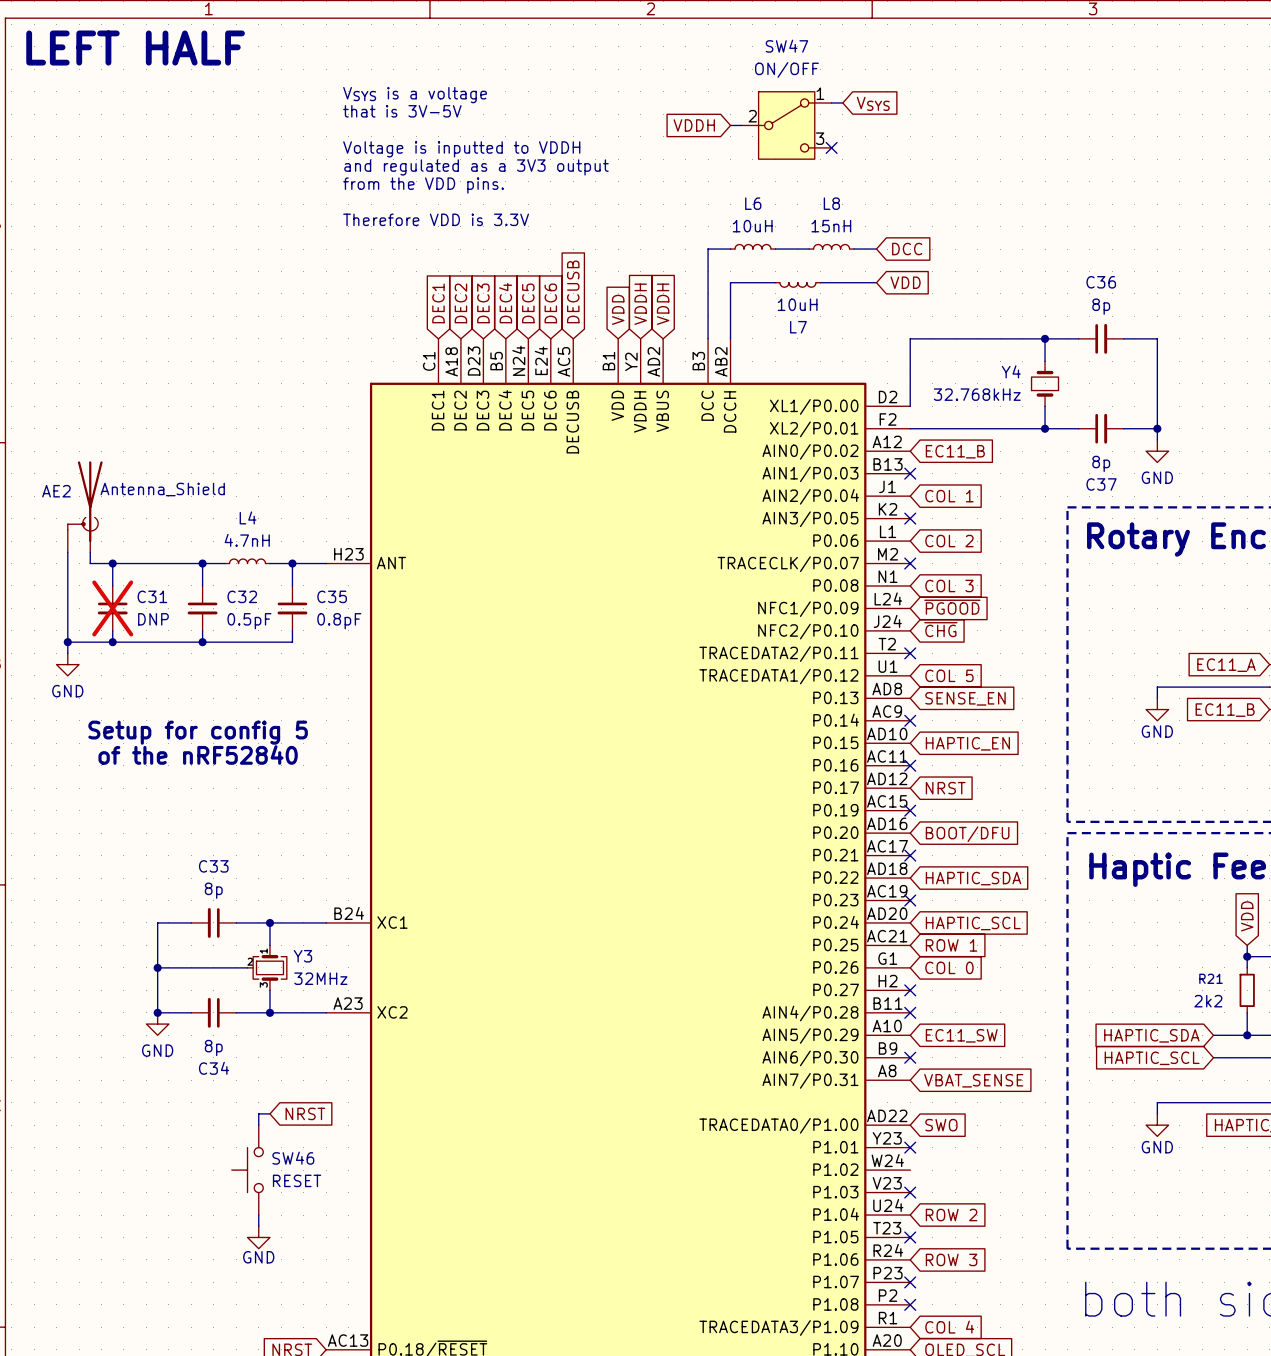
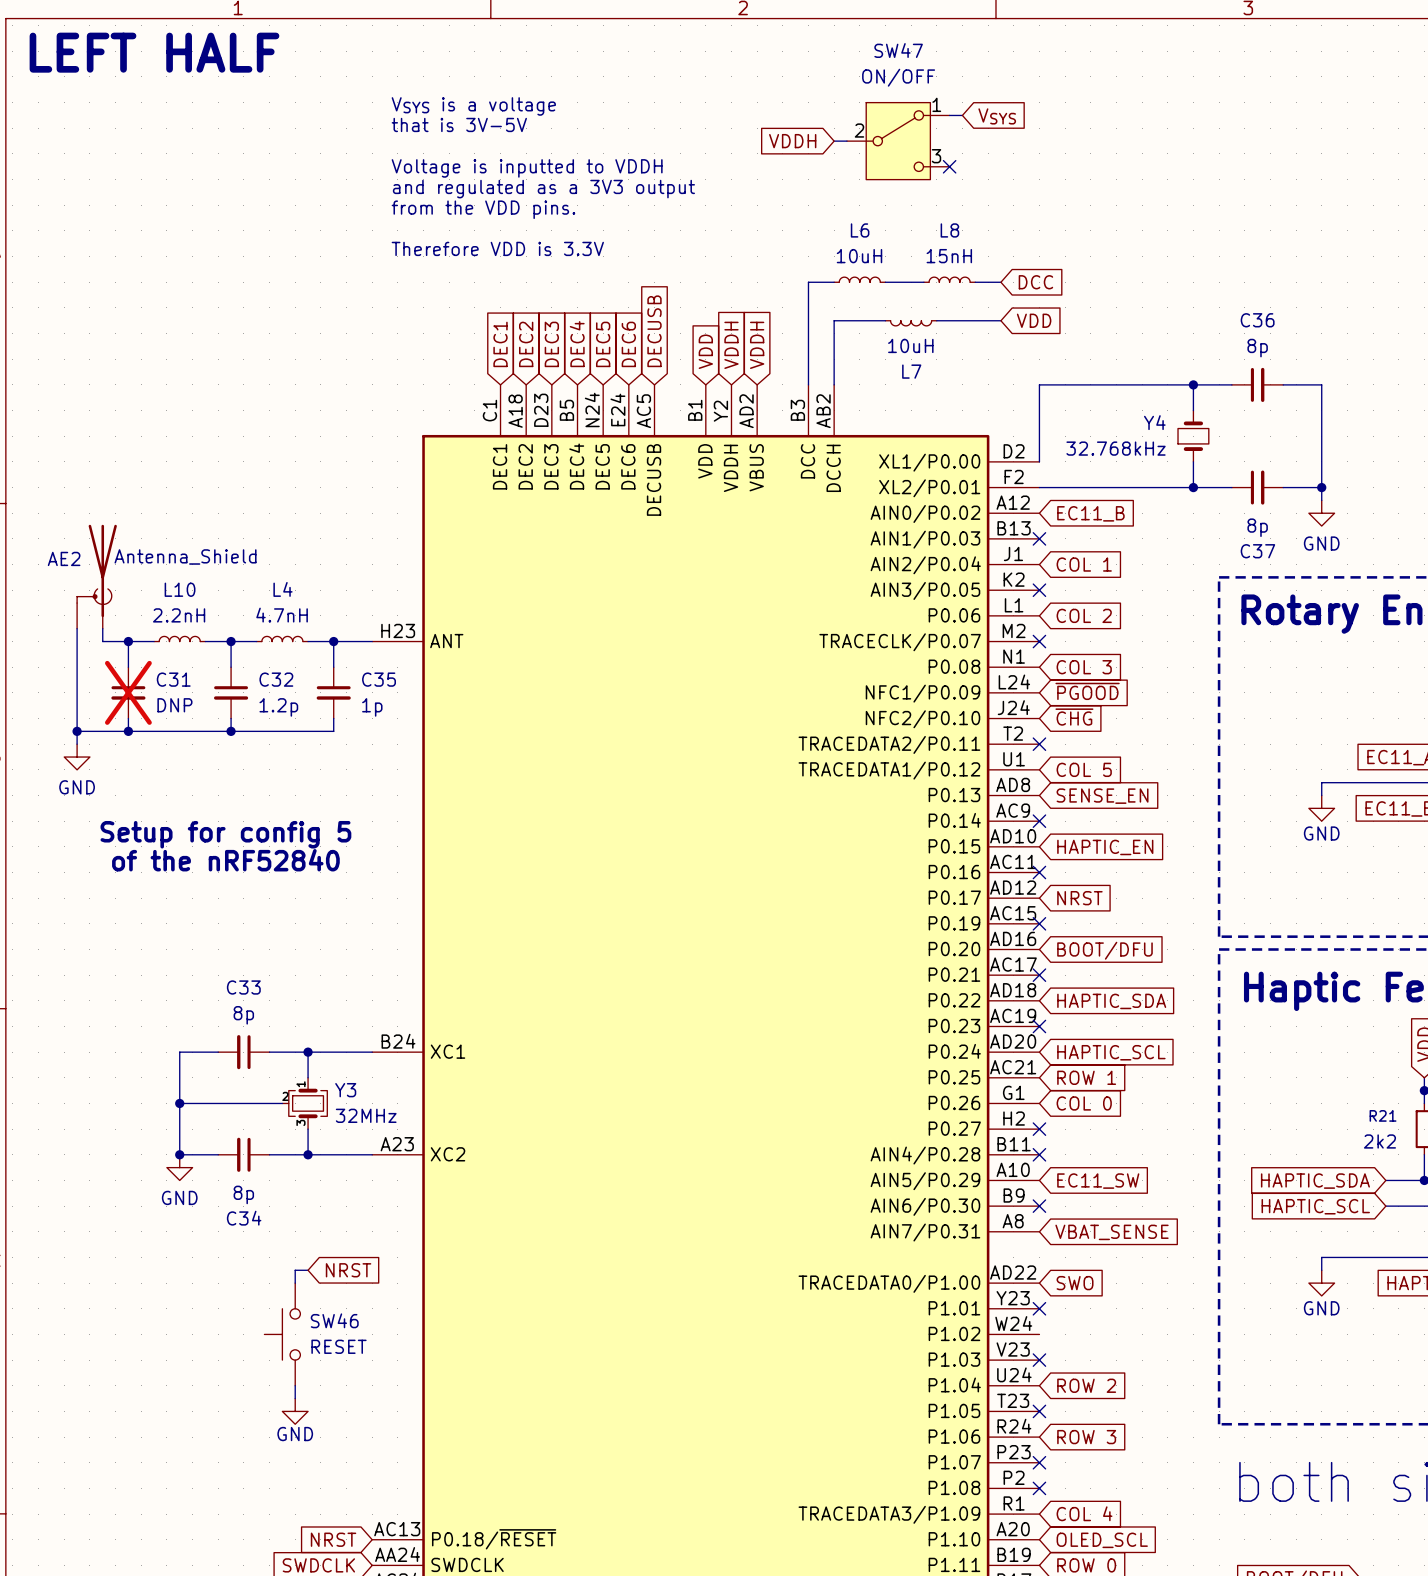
L10: none -> 2.2nH (179, 638)
wire: (135, 563) (180, 563) -> none
C32 value: 0.5pF (249, 621) -> 1.2p (278, 707)
C35 value: 0.8pF (339, 621) -> 1p (372, 707)

